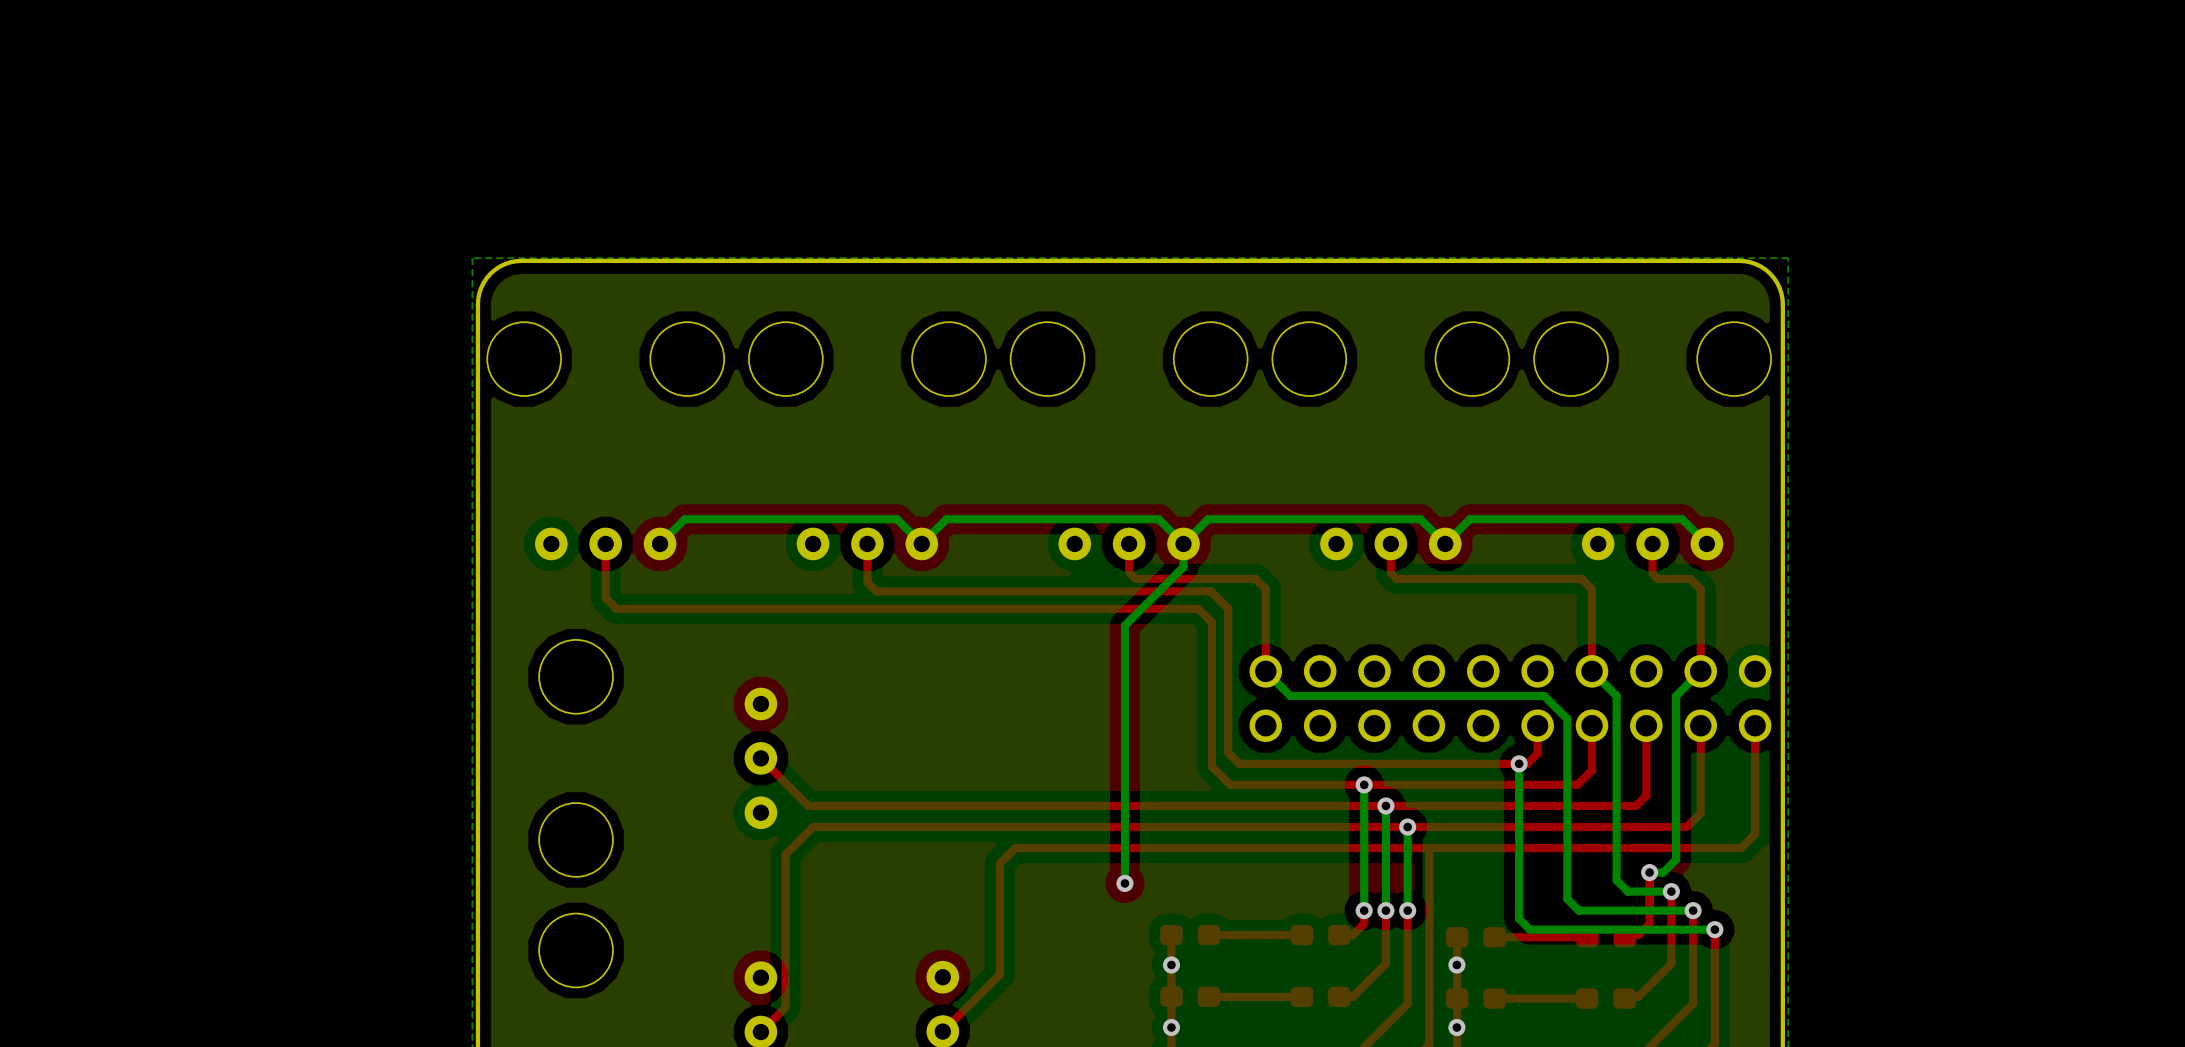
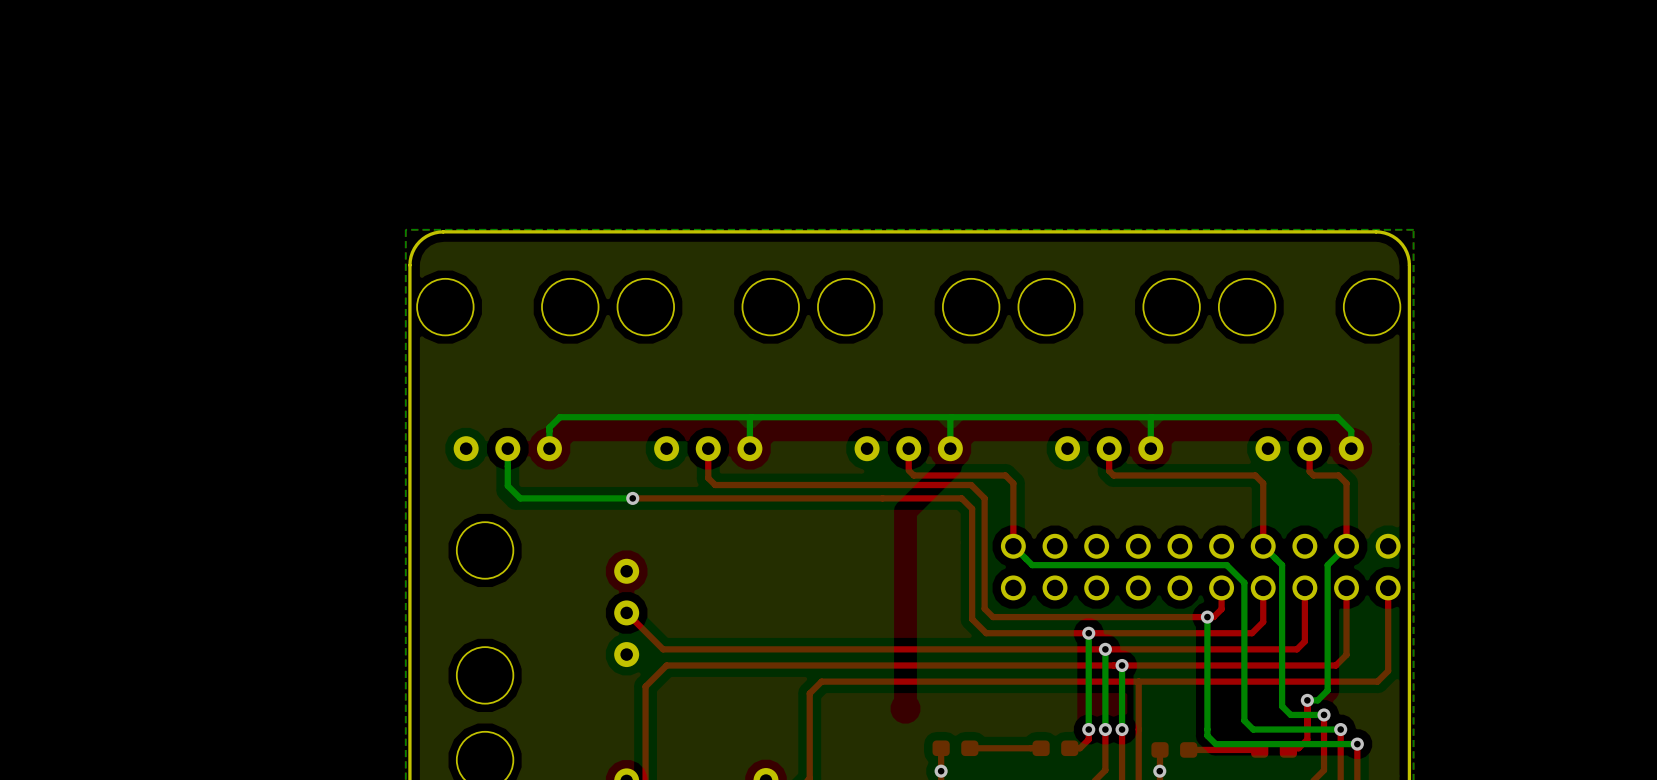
bottom track: none -> (751, 417) (749, 448)
bottom track: none -> (1151, 417) (1150, 448)
top track: (605, 543) (605, 597) (616, 608) (768, 608) -> none
bottom track: none -> (507, 448) (507, 485) (520, 498) (632, 498)
bottom track: (1183, 543) (1183, 567) (1124, 625) (1124, 883) -> (950, 448) (951, 417)
bottom track: (1183, 543) (1158, 519) (946, 519) (921, 543) (897, 519) (684, 519) (660, 543) -> (1351, 448) (1351, 431) (1337, 417) (559, 417) (549, 427) (549, 448)
bottom track: (1706, 543) (1682, 519) (1469, 519) (1445, 543) (1420, 519) (1208, 519) (1183, 543) -> none
via: none -> (632, 498)
via: (1124, 883) -> none

